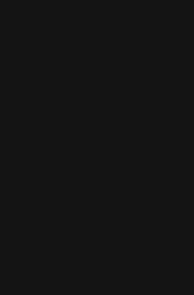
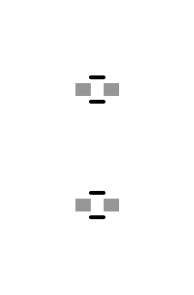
part: none -> (97, 89)
part: none -> (97, 205)

